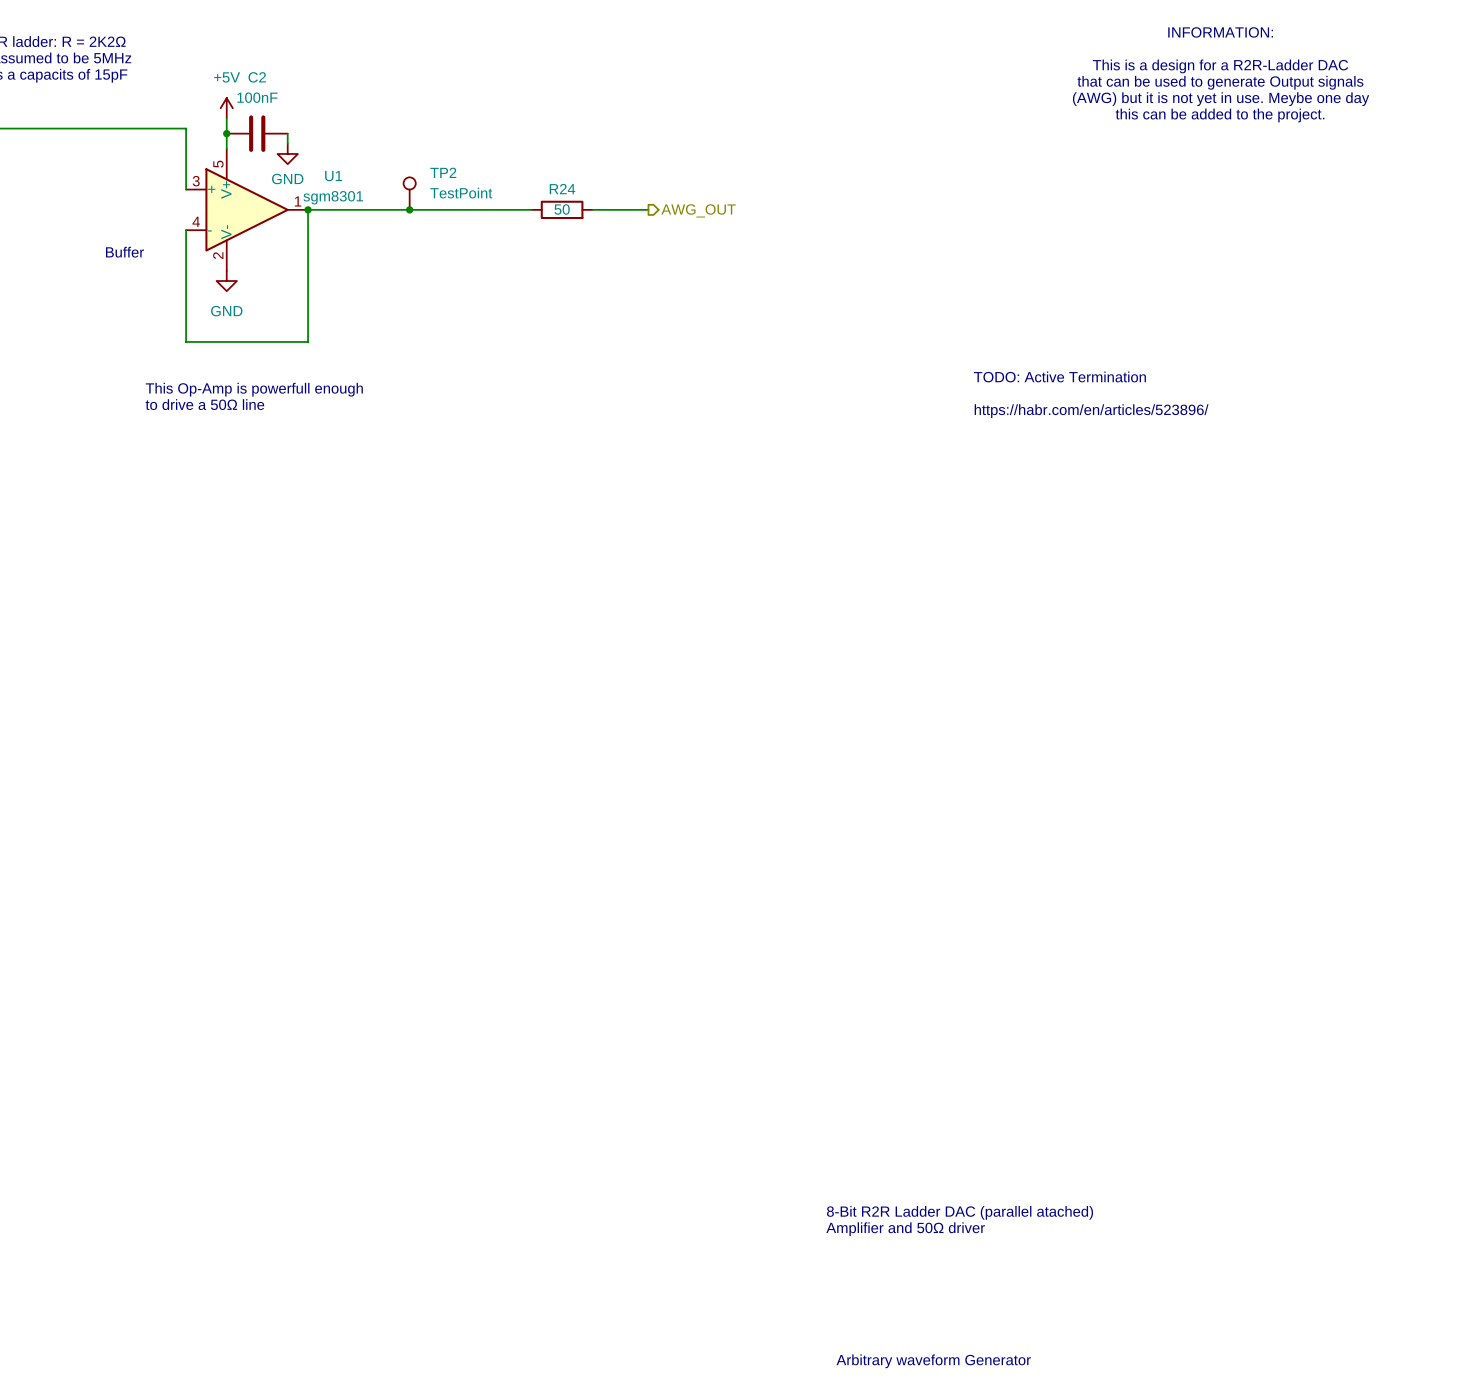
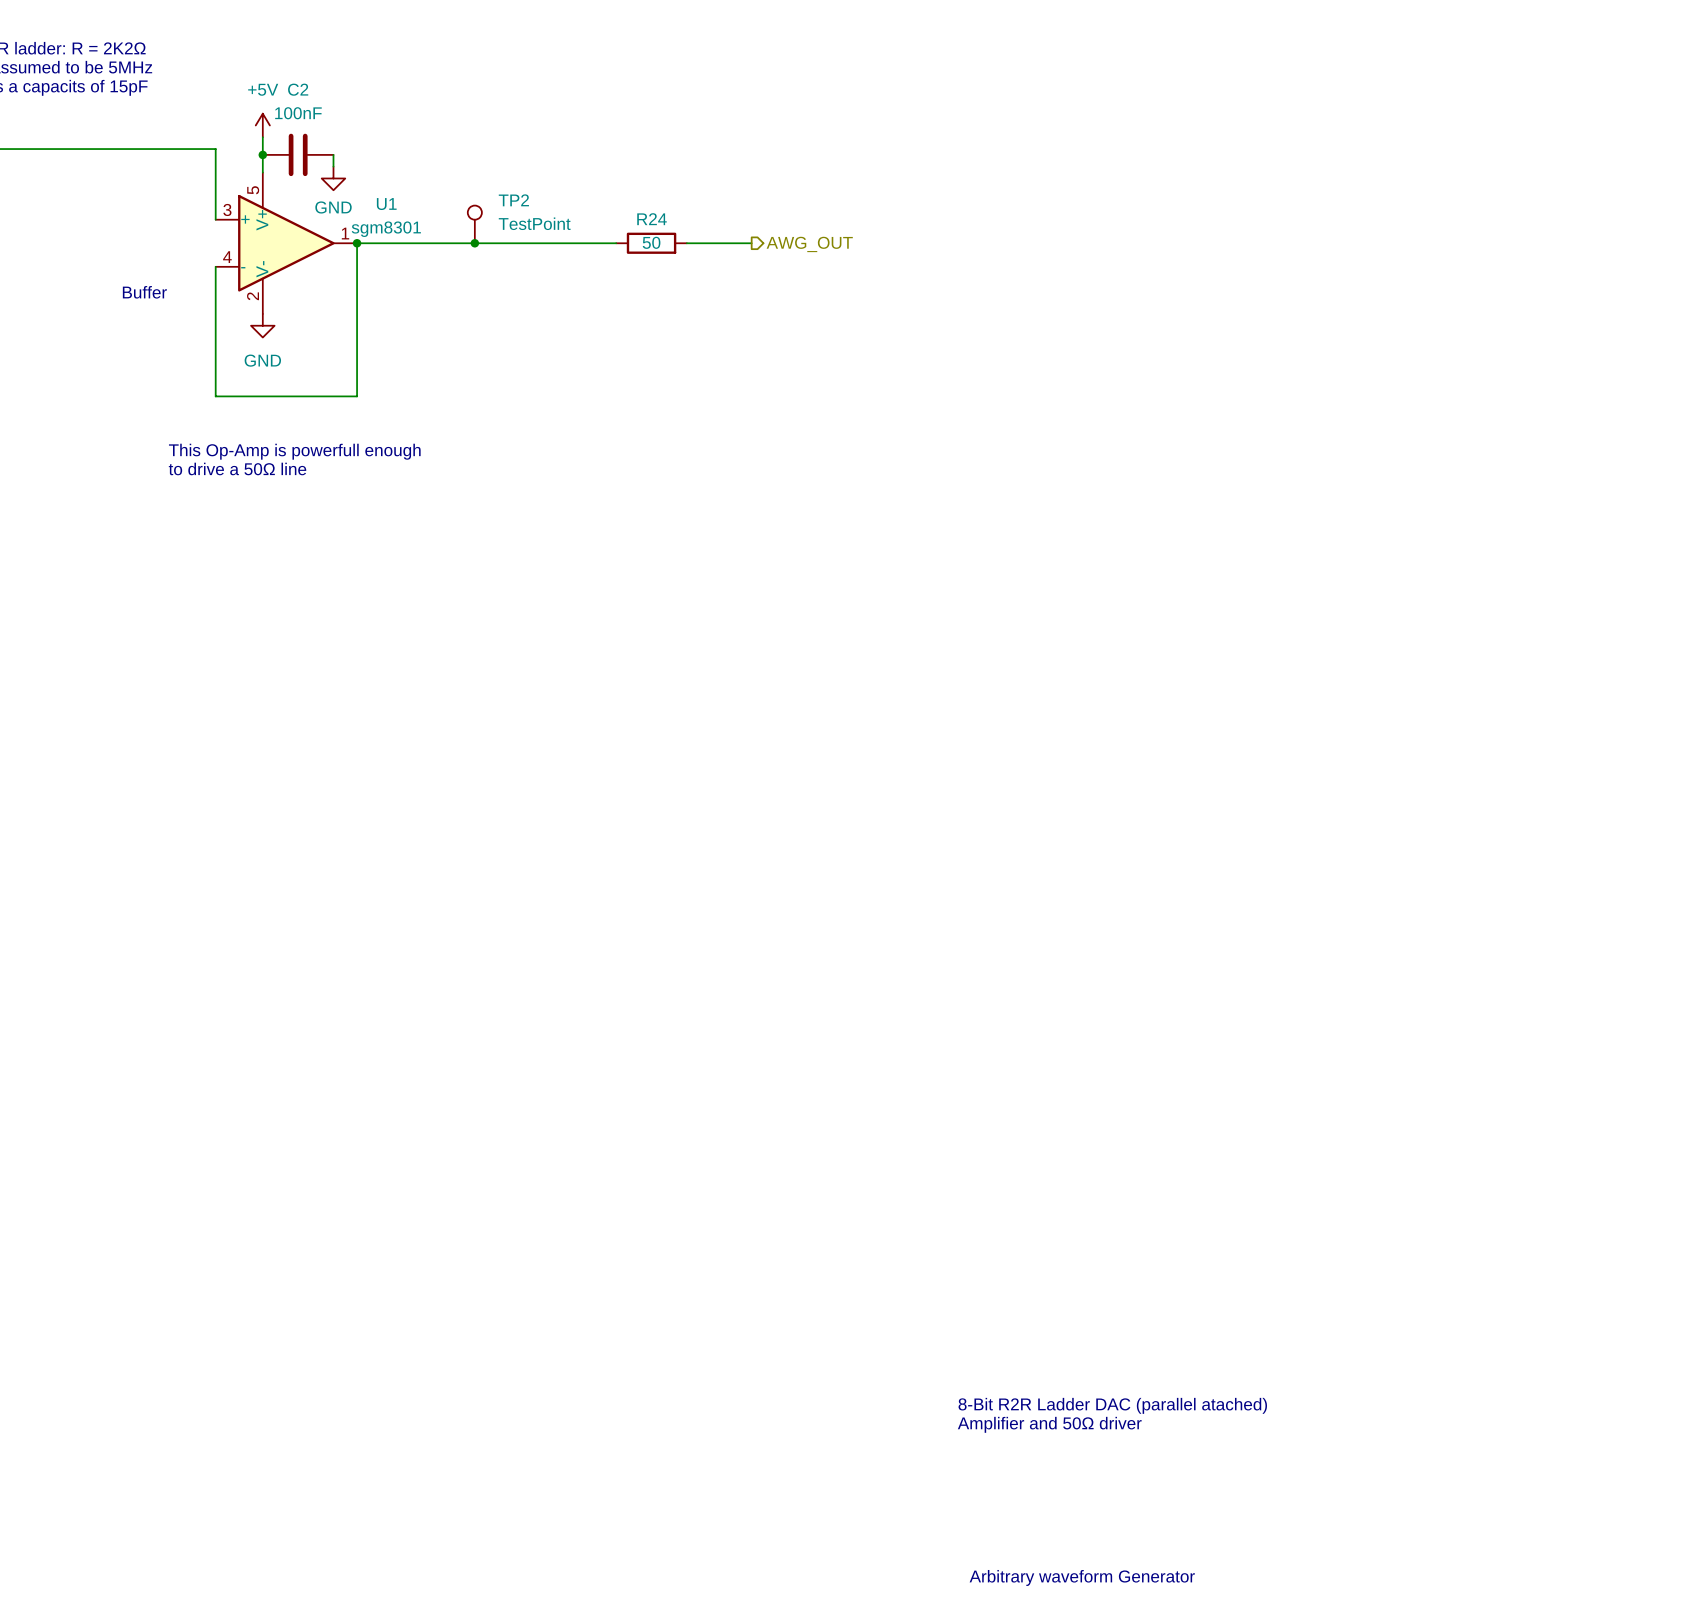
text: INFORMATION: (1220, 32) -> none
text: This is a design for a R2R-Ladder DAC (1220, 66) -> none
text: that can be used to generate Output signals (1220, 82) -> none
text: (AWG) but it is not yet in use. Meybe one day (1221, 99) -> none
text: this can be added to the project. (1220, 115) -> none
text: TODO: Active Termination (1059, 376) -> none
text: https://habr.com/en/articles/523896/ (1091, 411) -> none

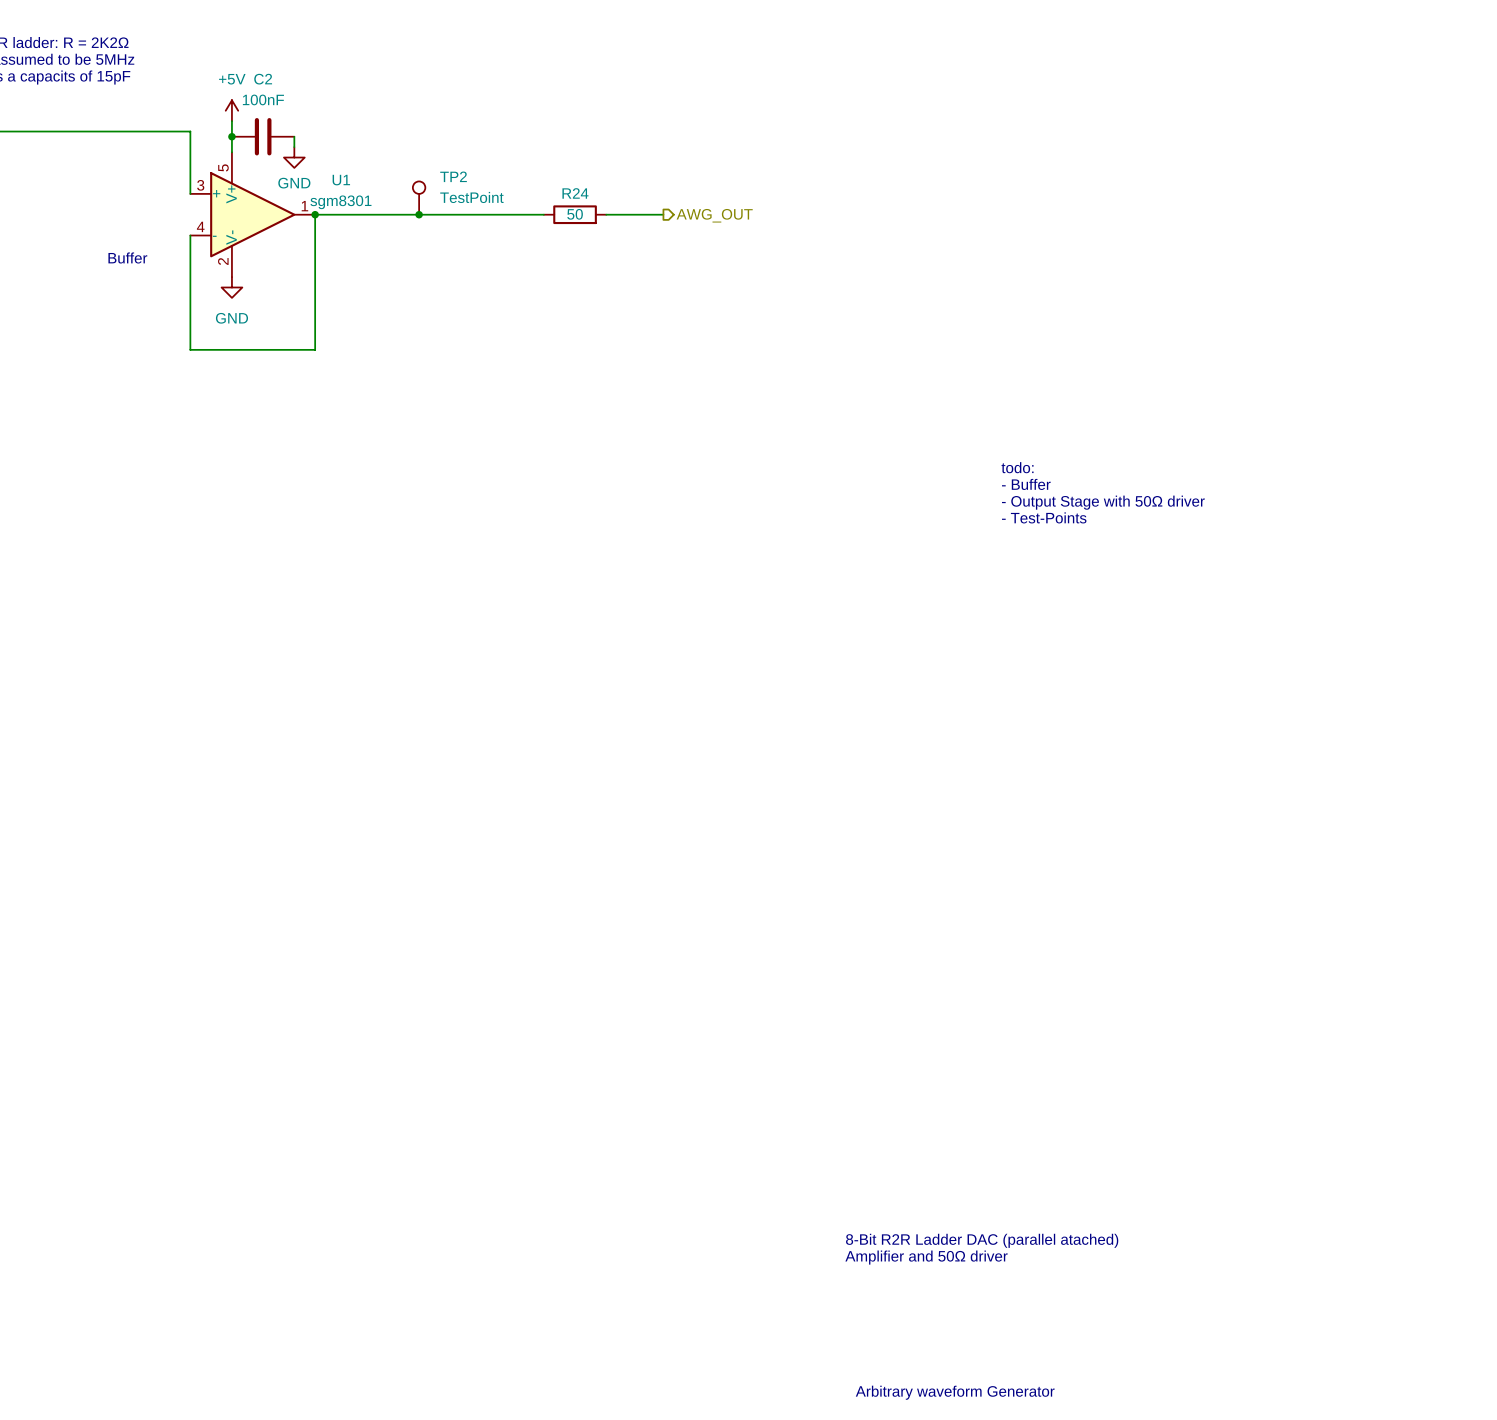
text: This Op-Amp is powerfull enough (294, 451) -> none
text: to drive a 50Ω line (237, 468) -> none
text: none -> todo: (1017, 467)
text: none -> - Buffer (1026, 484)
text: none -> - Output Stage with 50Ω driver (1103, 502)
text: none -> - Test-Points (1044, 517)

